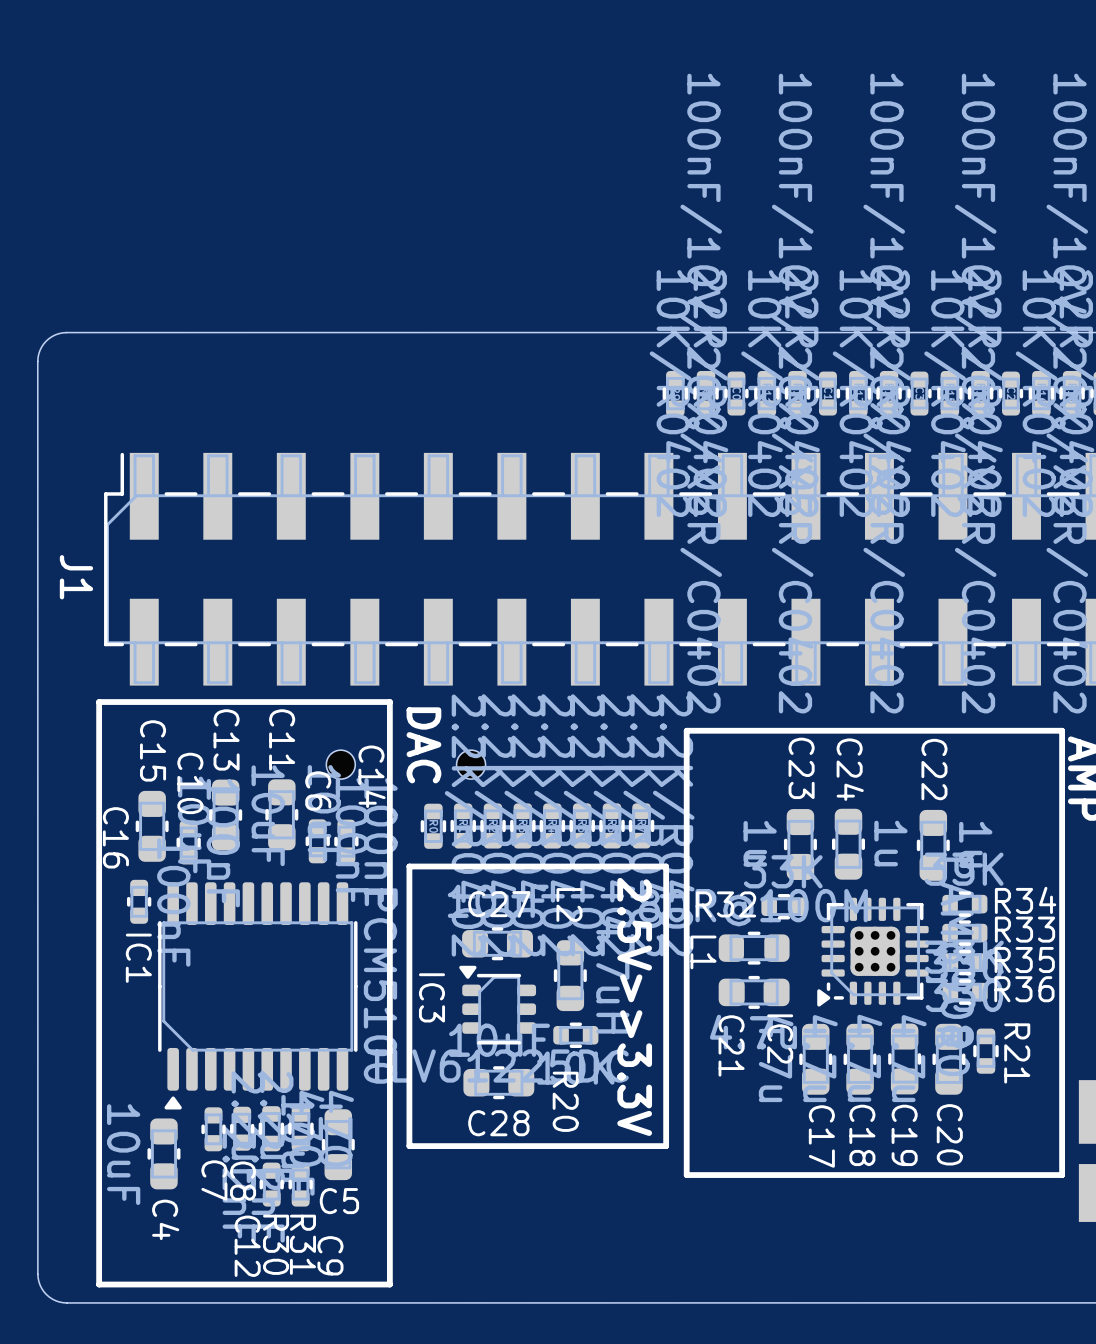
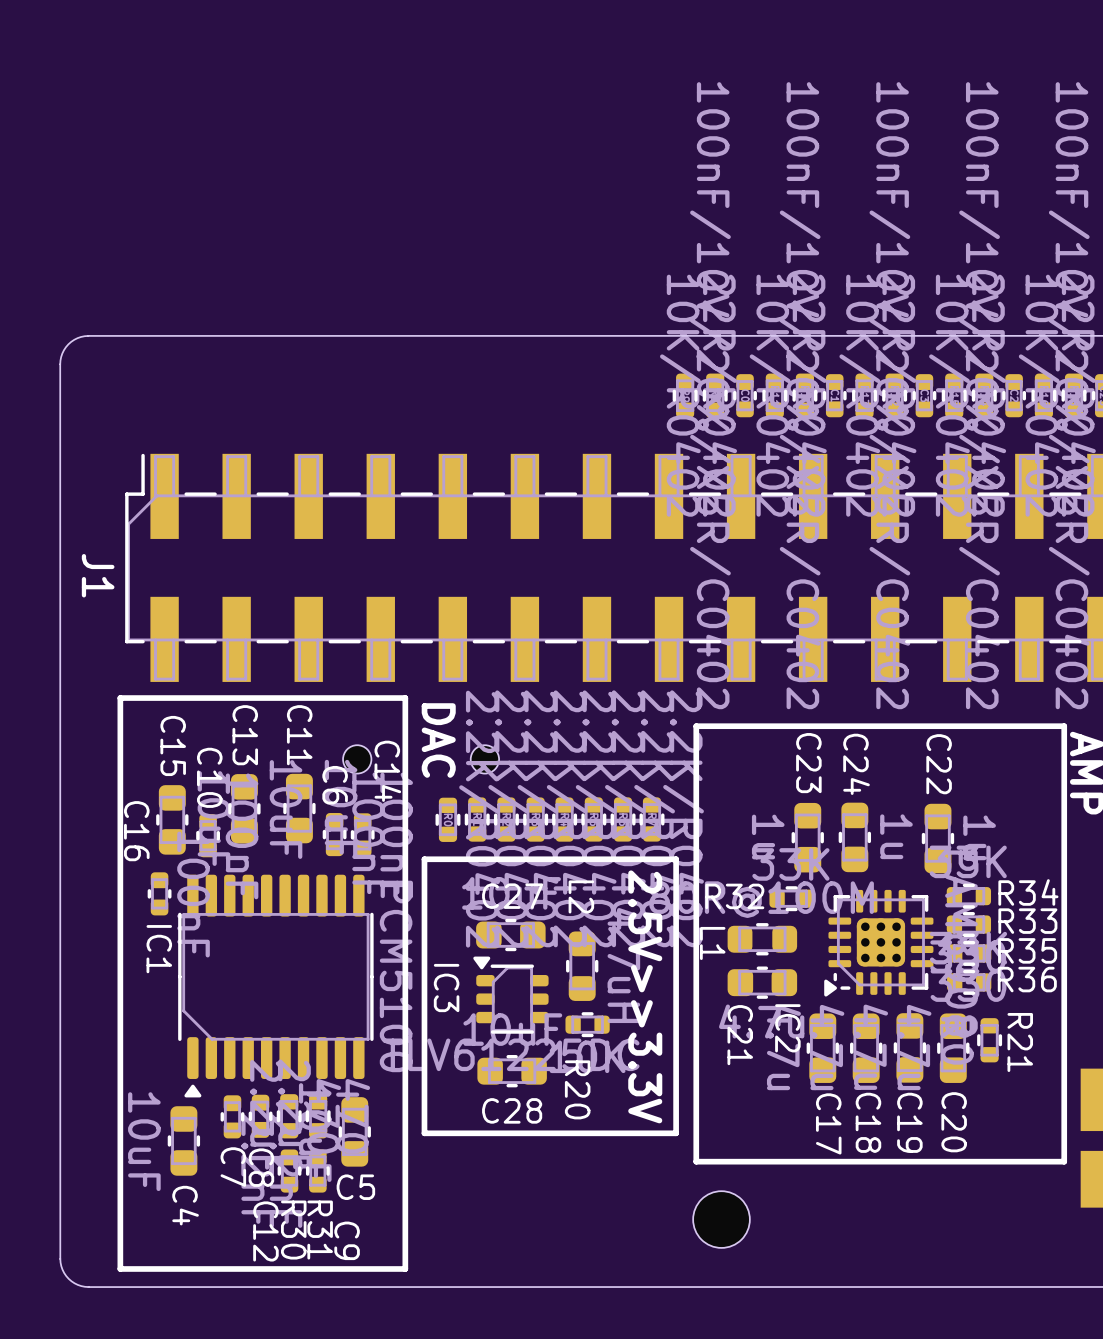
part: none -> (721, 1219)

